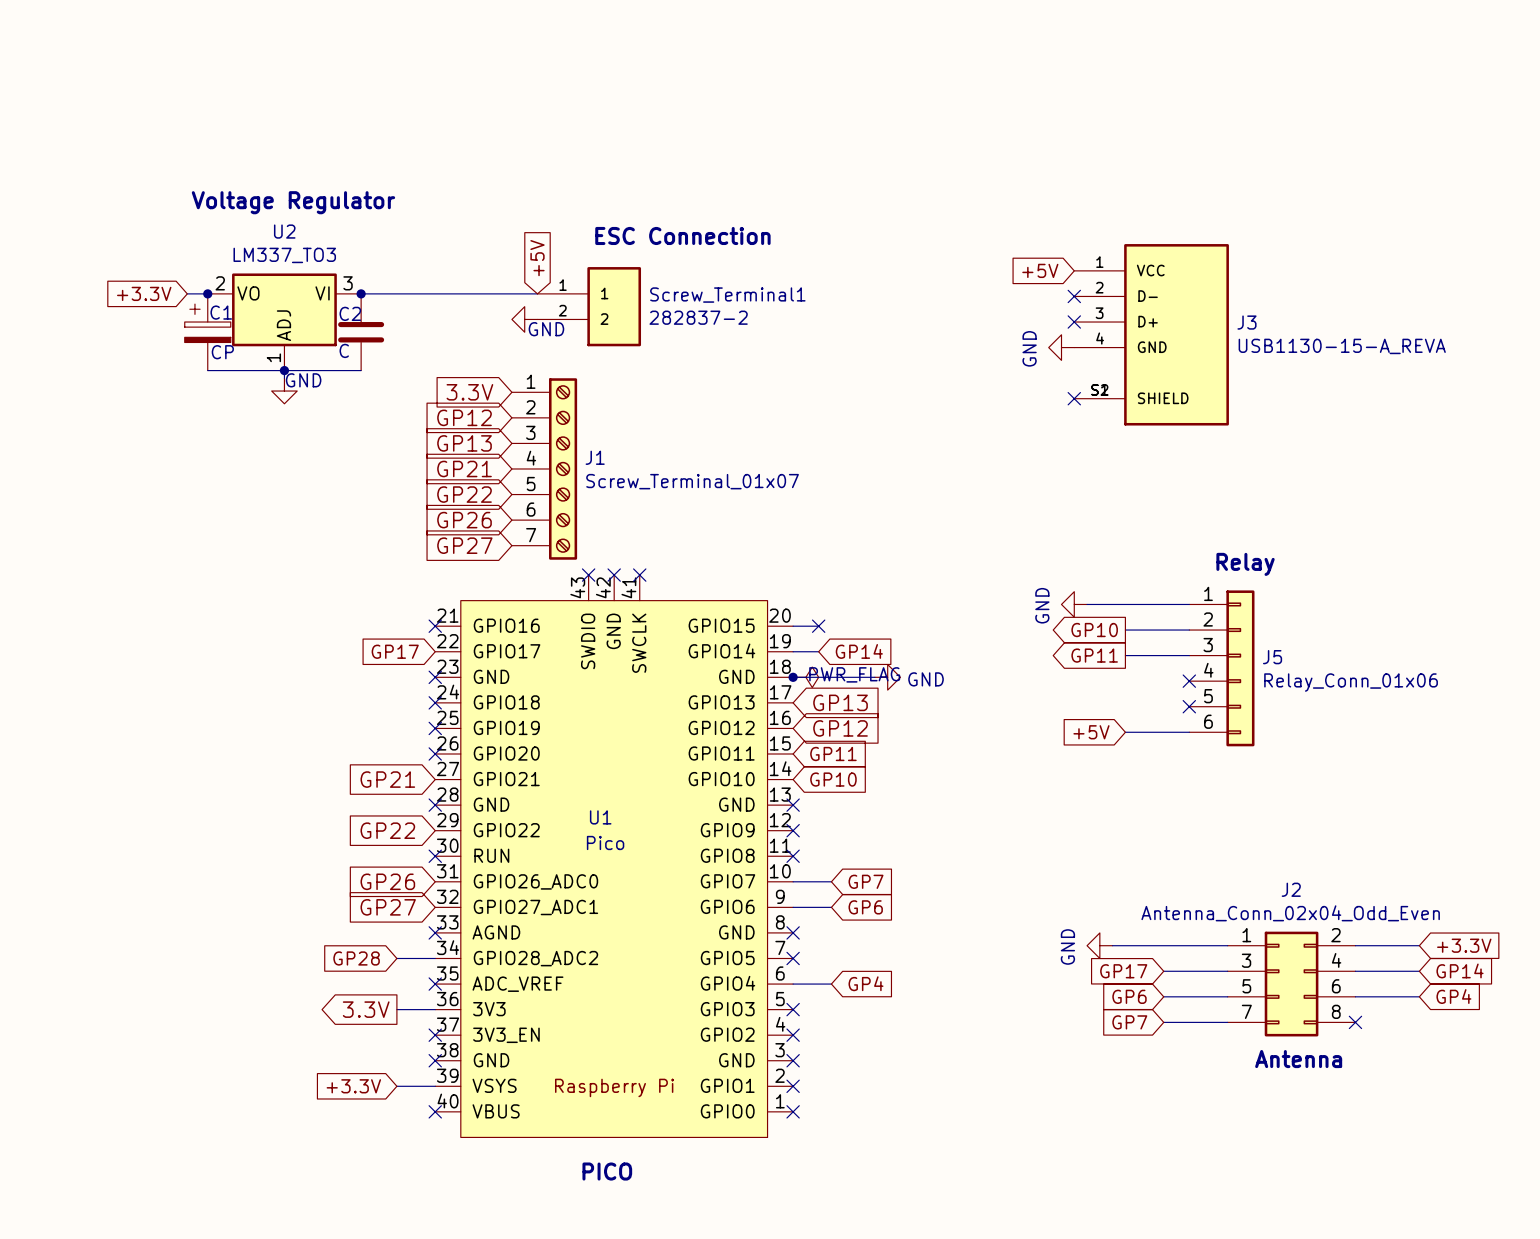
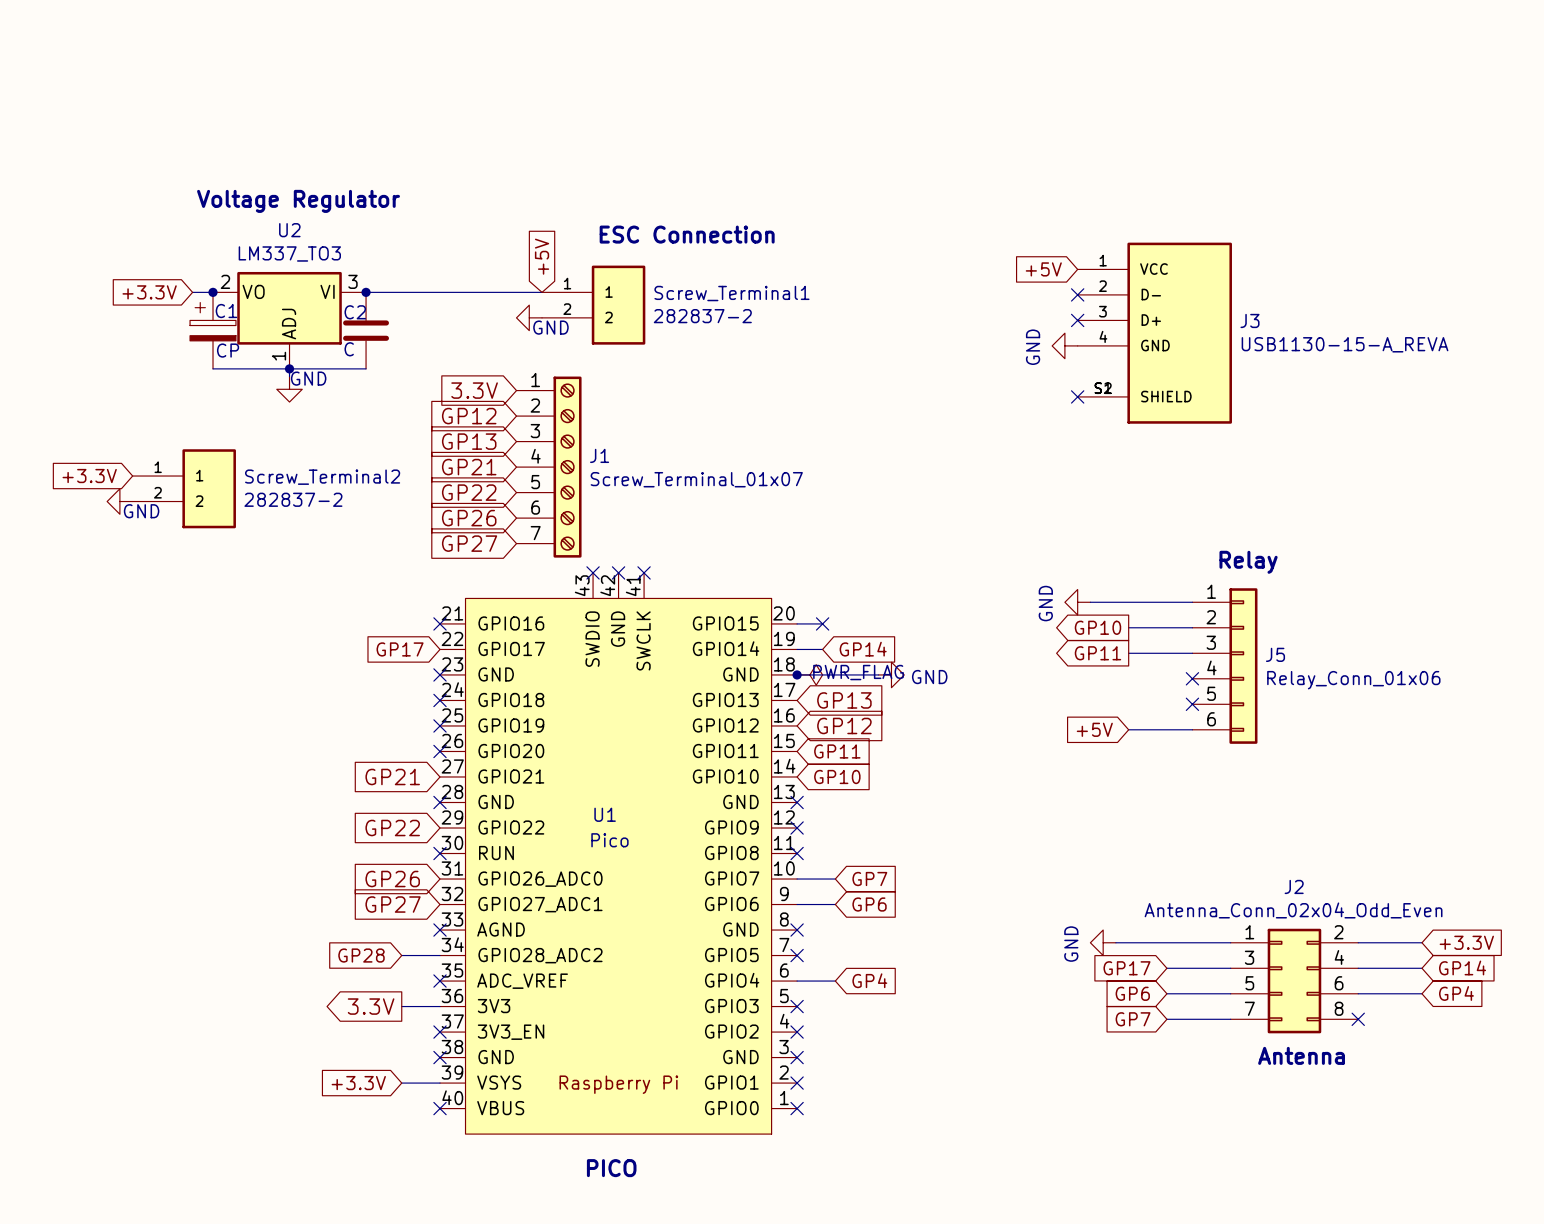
global label: none -> +3.3V (89, 476)
Screw_Terminal2: none -> 282837-2 (184, 488)
power symbol: none -> GND (119, 501)

